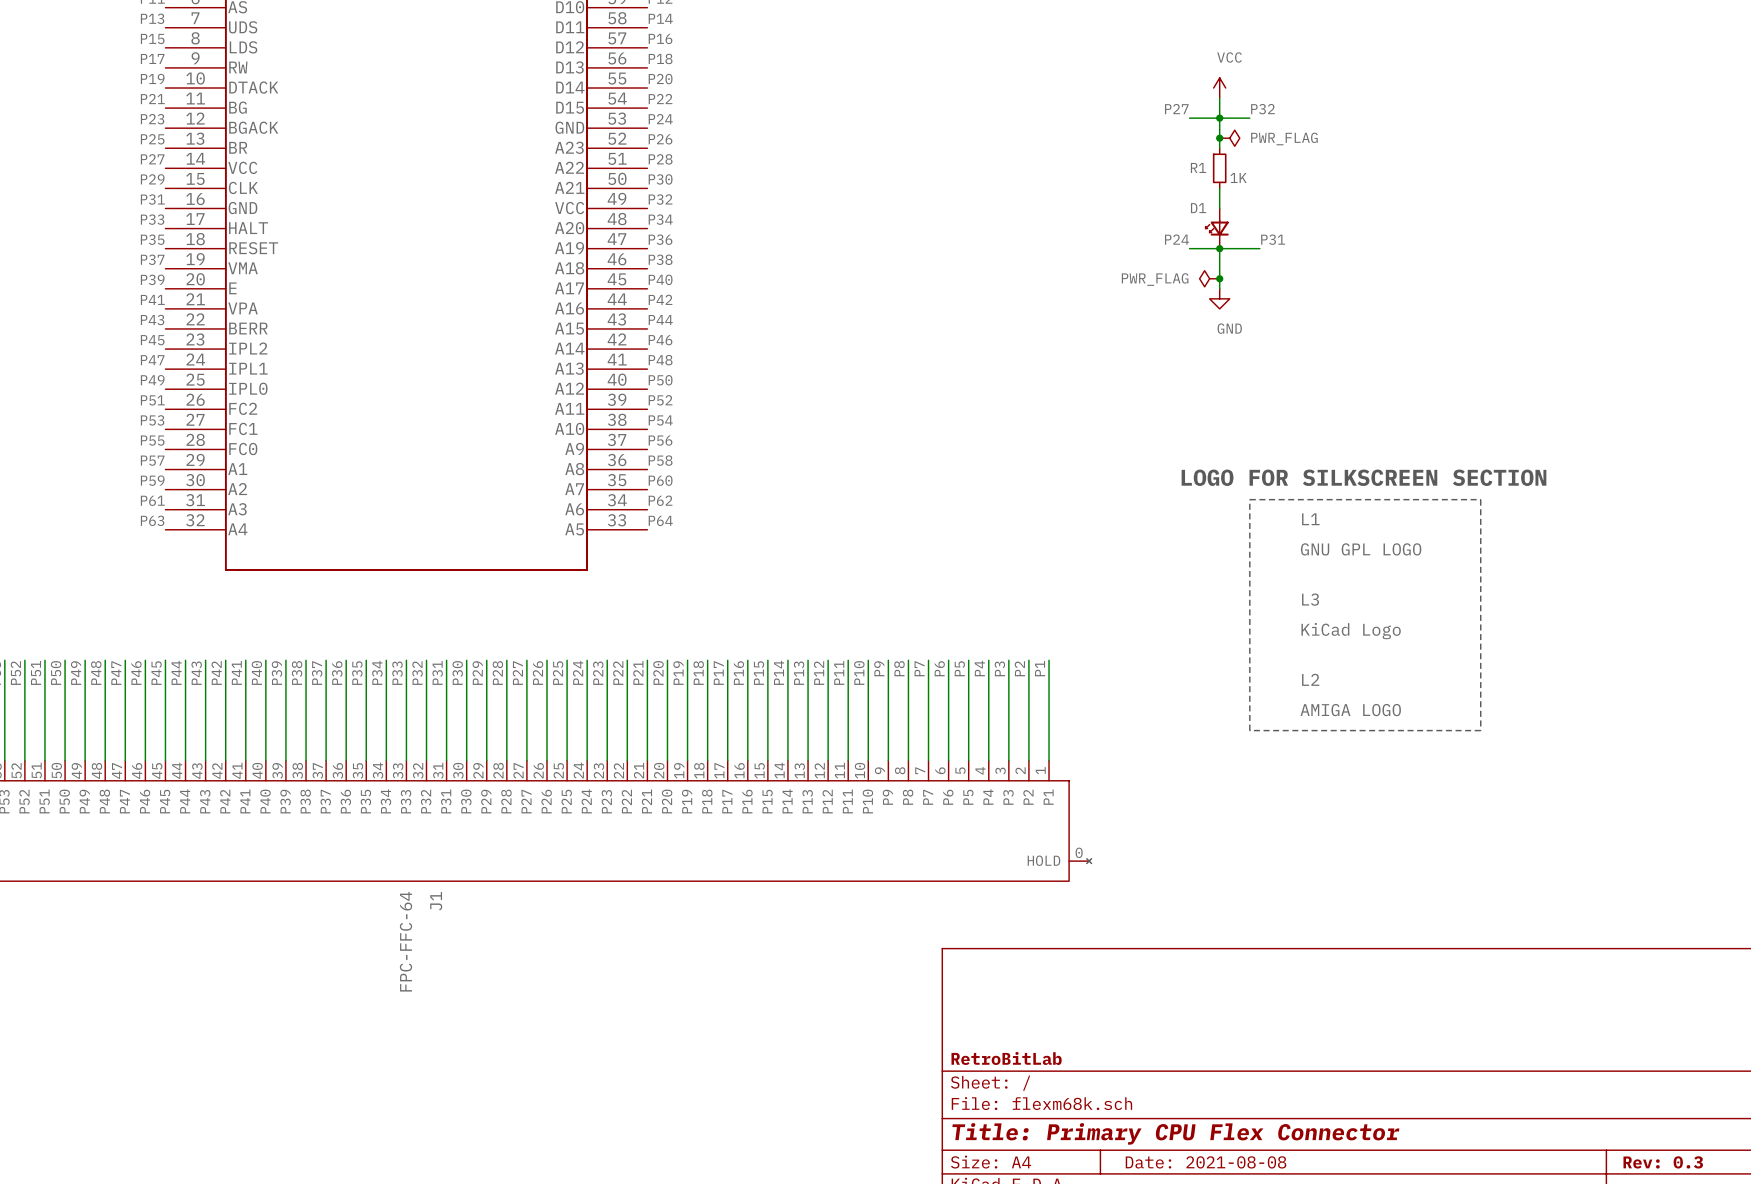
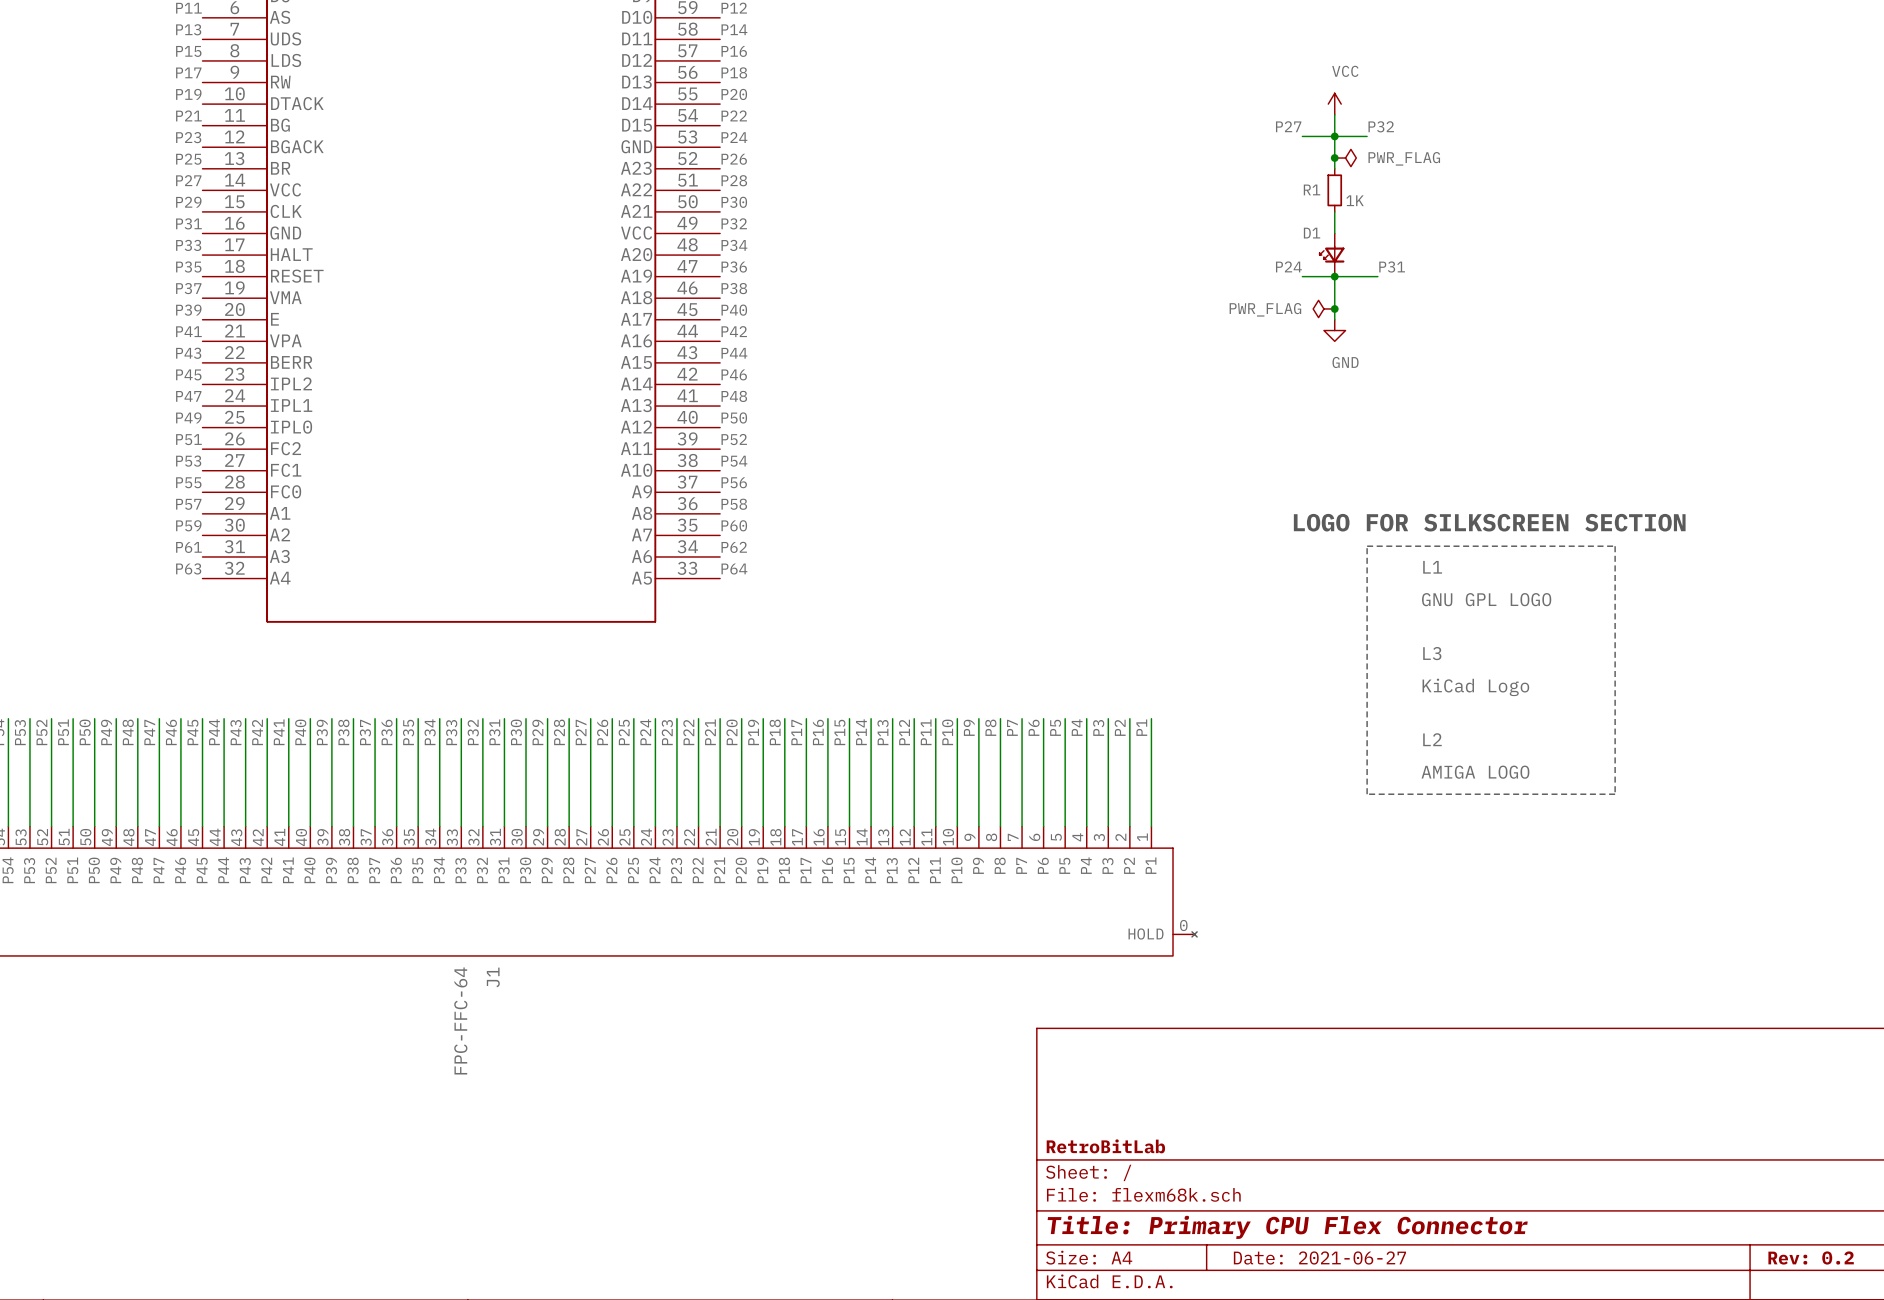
title block: Date: 2021-08-08 (1206, 1162) -> Date: 2021-06-27 (1319, 1257)
title block: Rev: 0.3 (1663, 1162) -> Rev: 0.2 (1811, 1257)

